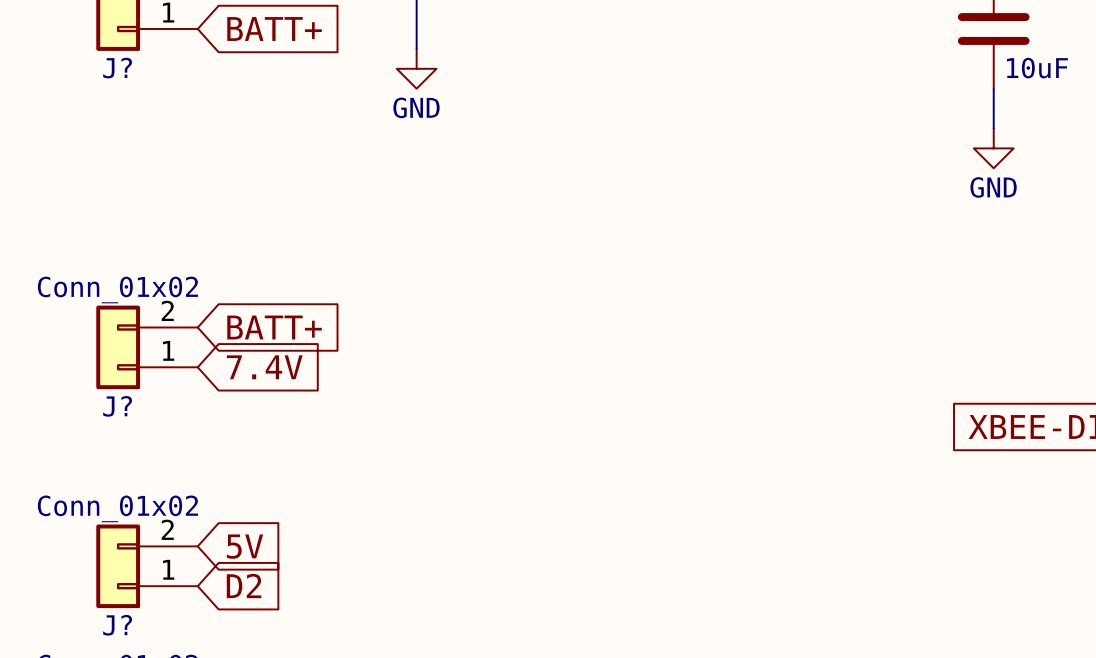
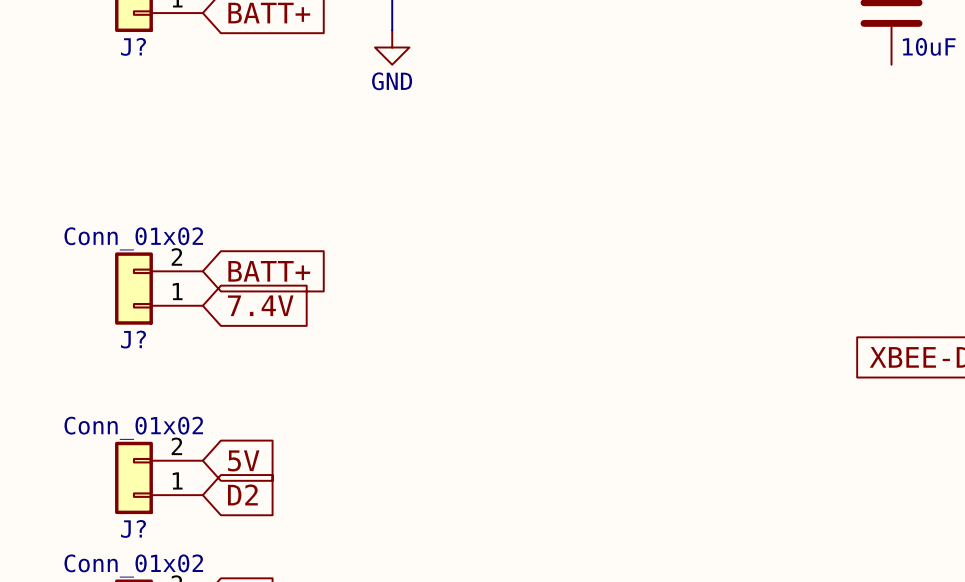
wire: (993, 88) (993, 128) -> none
power symbol: GND (993, 148) -> none

